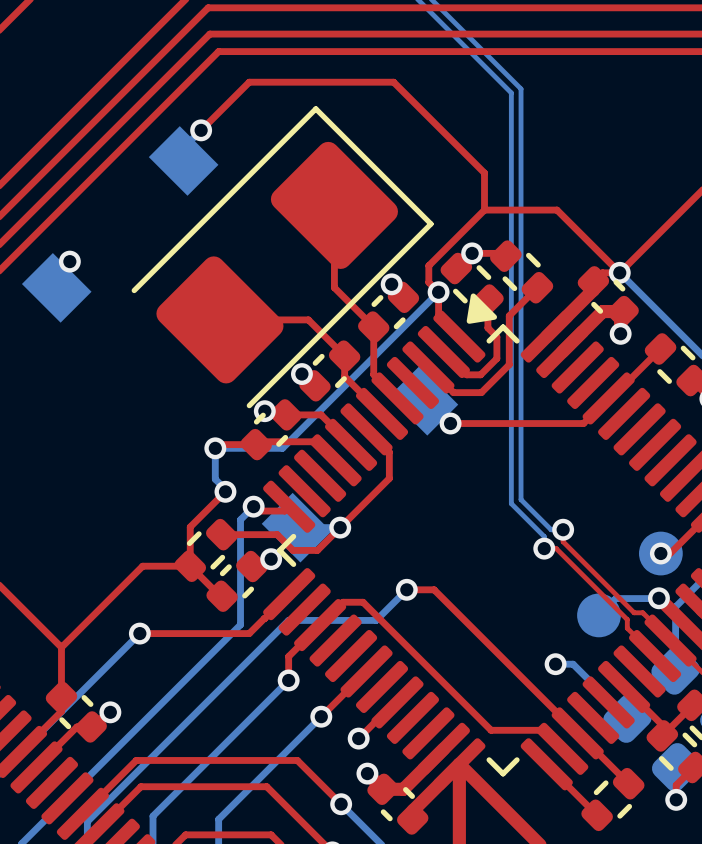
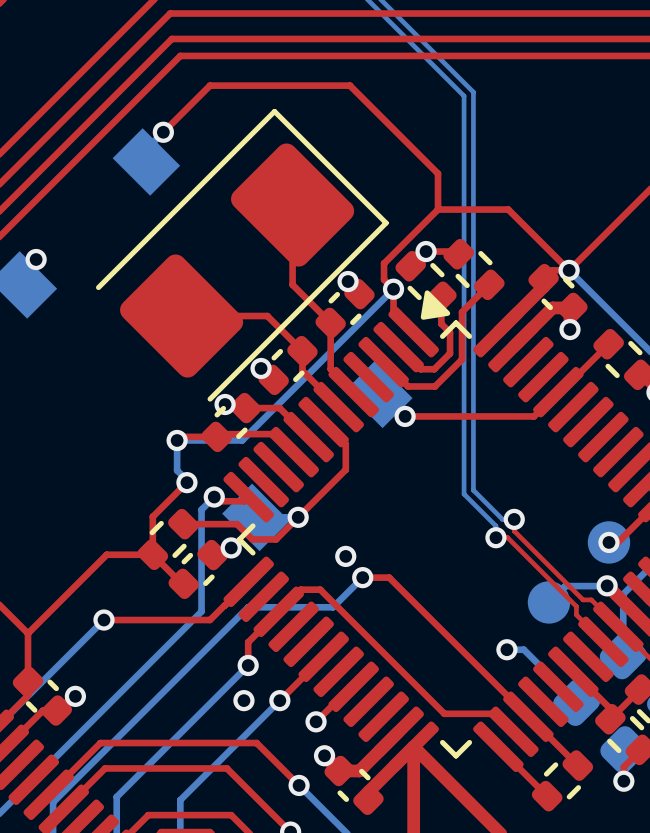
via: none -> (345, 556)
via: none -> (243, 700)

